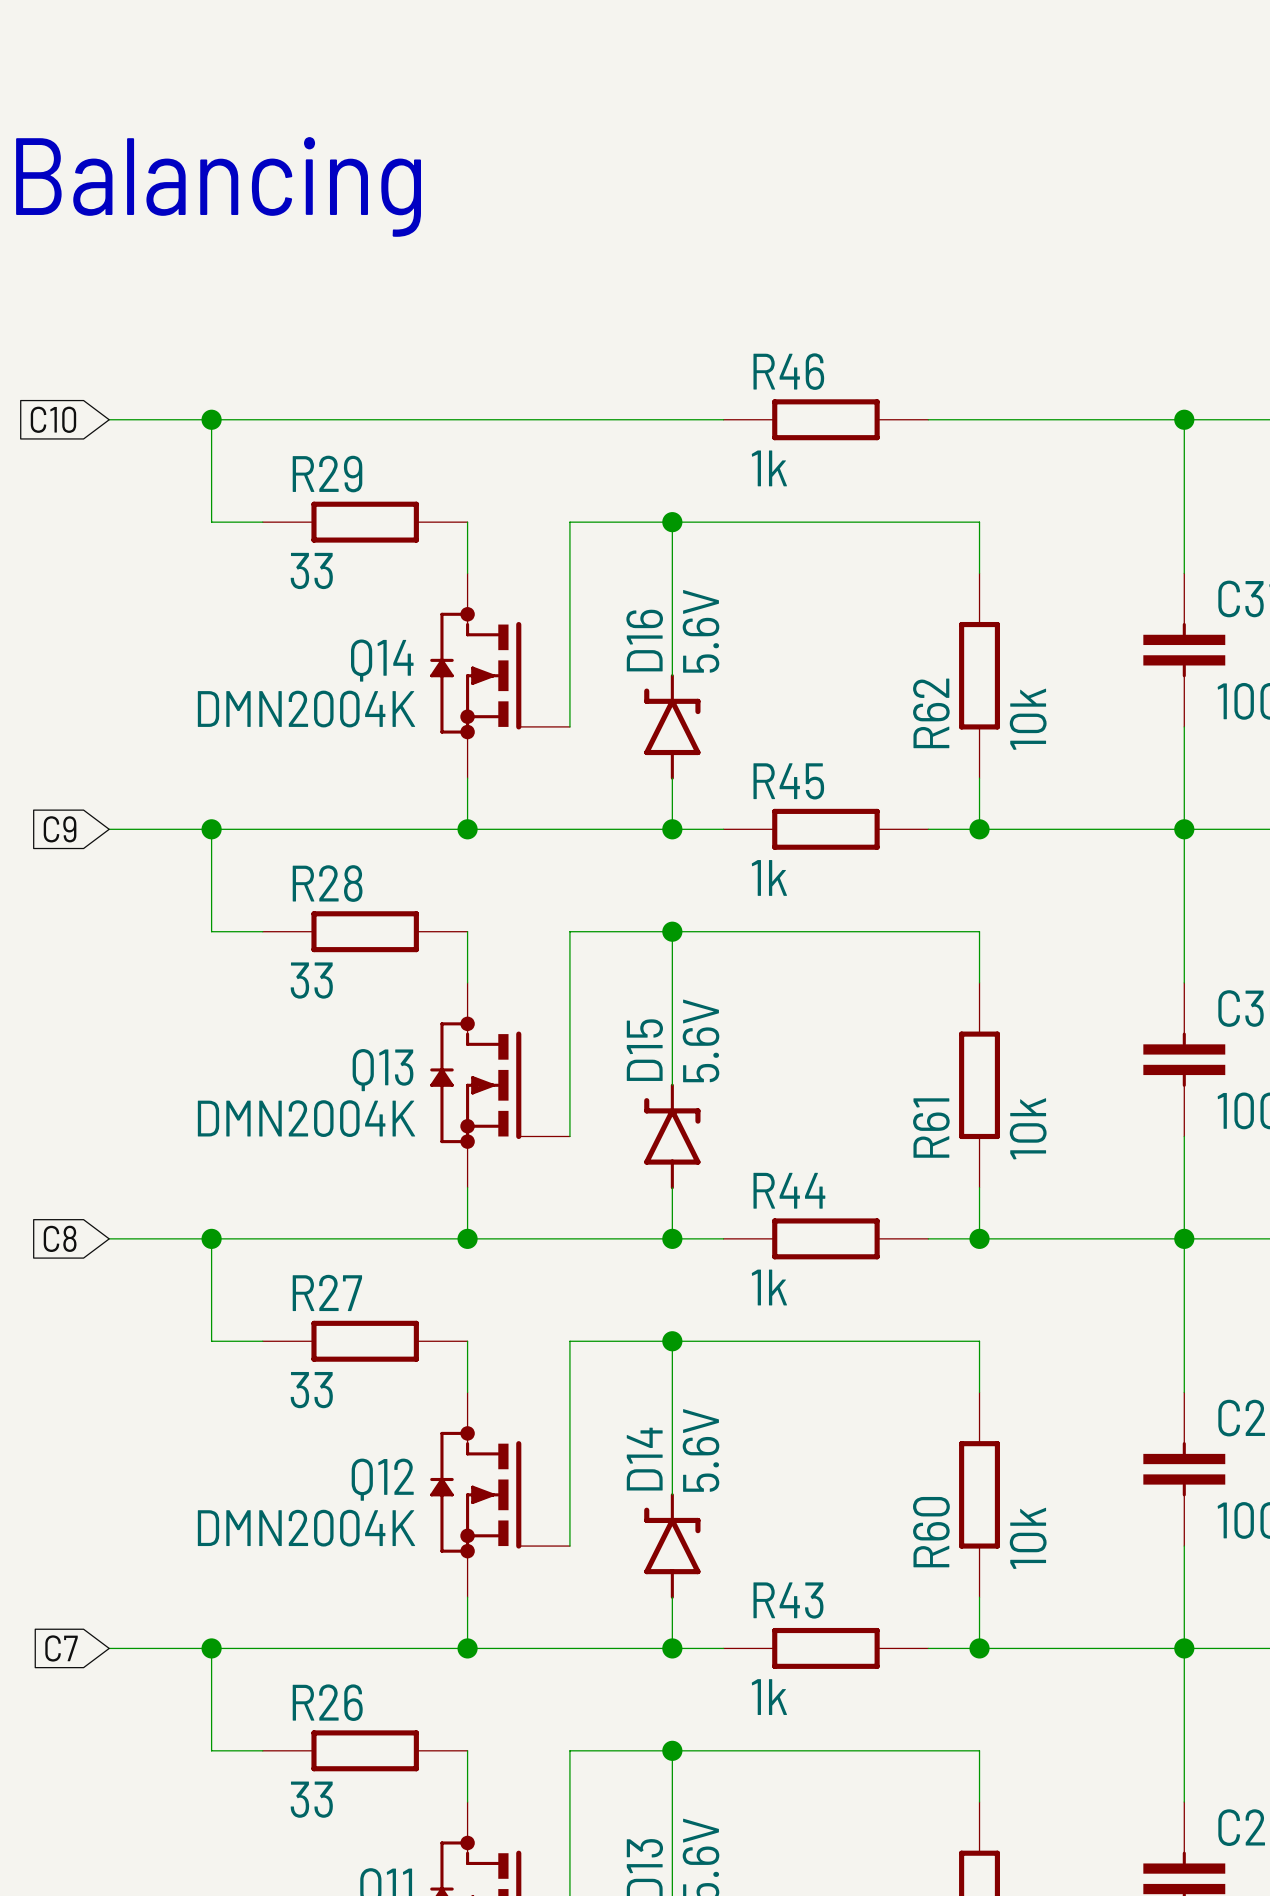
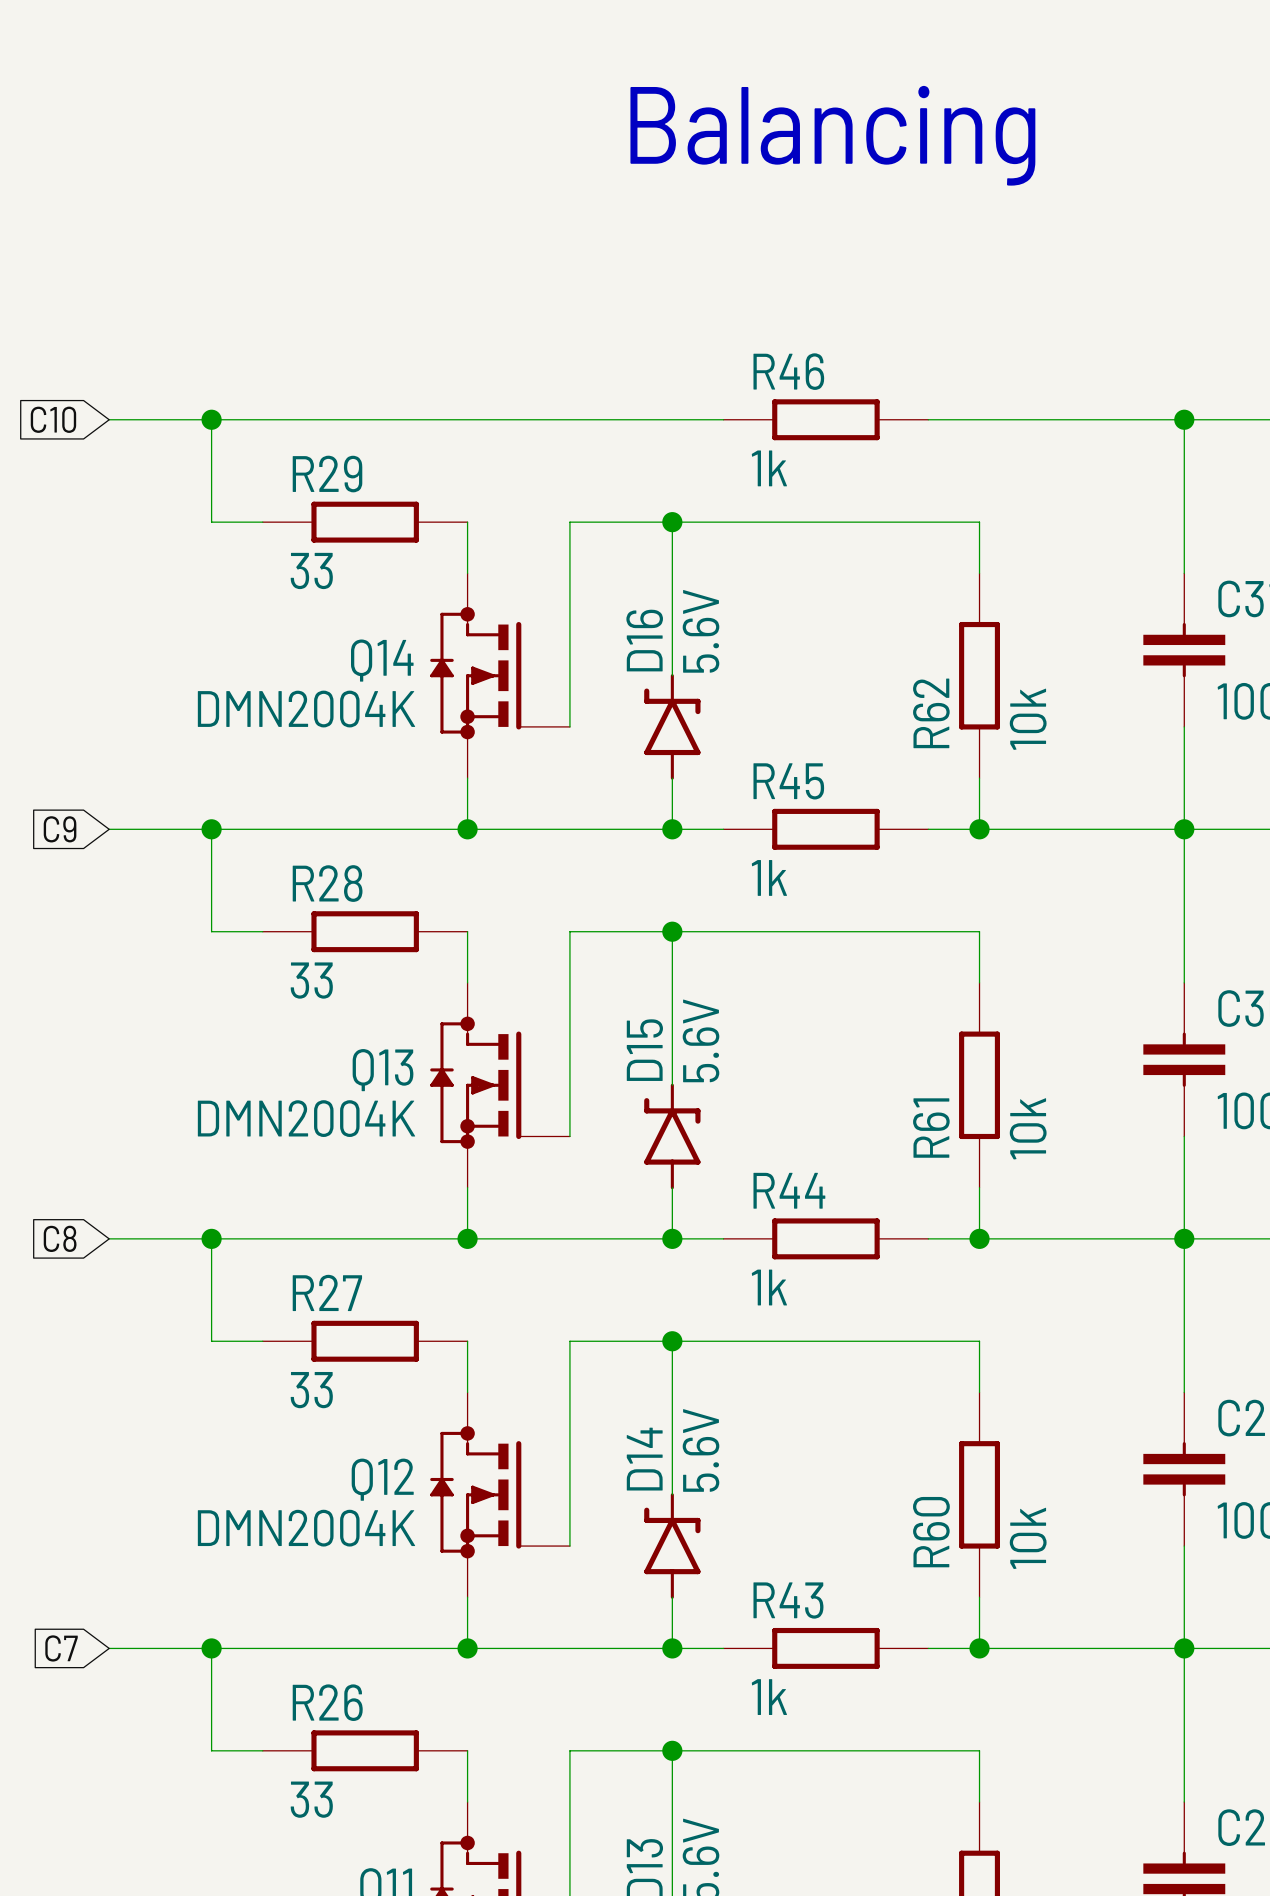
text: none -> Balancing (832, 135)
text: Balancing (218, 186) -> none

